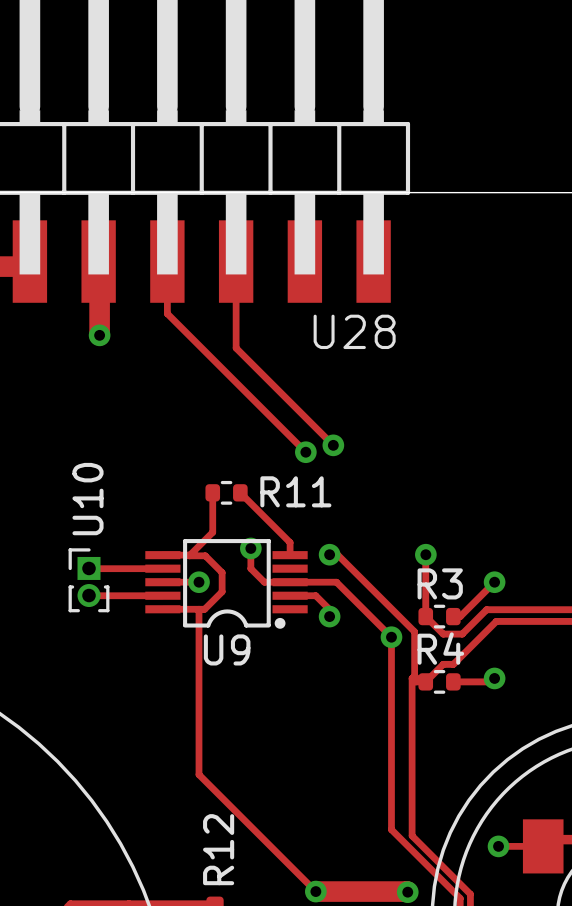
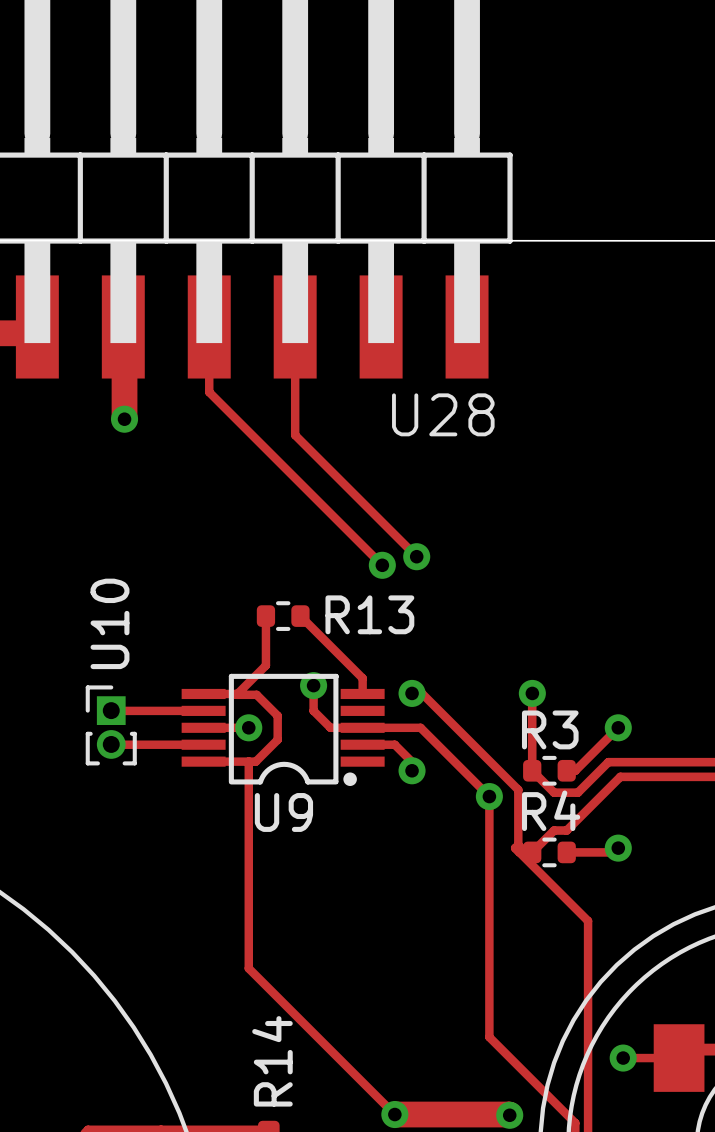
R11 name: R11 (295, 491) -> R13 (369, 614)
track: (412, 678) (412, 835) (470, 894) -> (515, 848) (588, 921) (588, 1117)
R12 name: R12 (218, 849) -> R14 (272, 1061)

